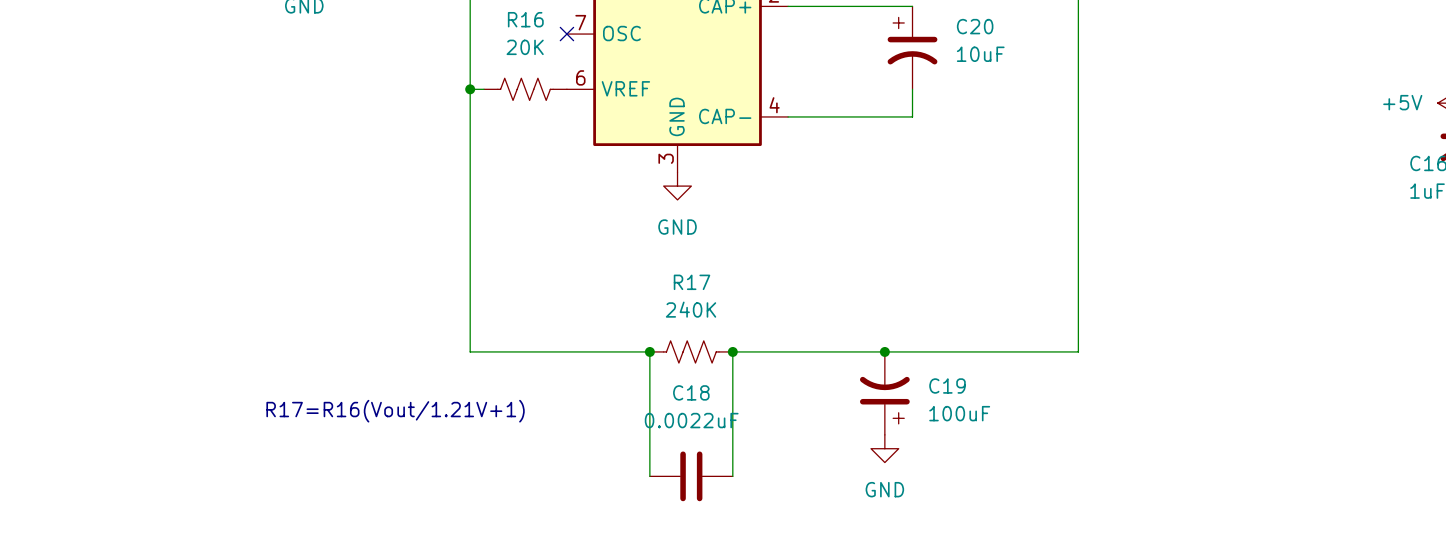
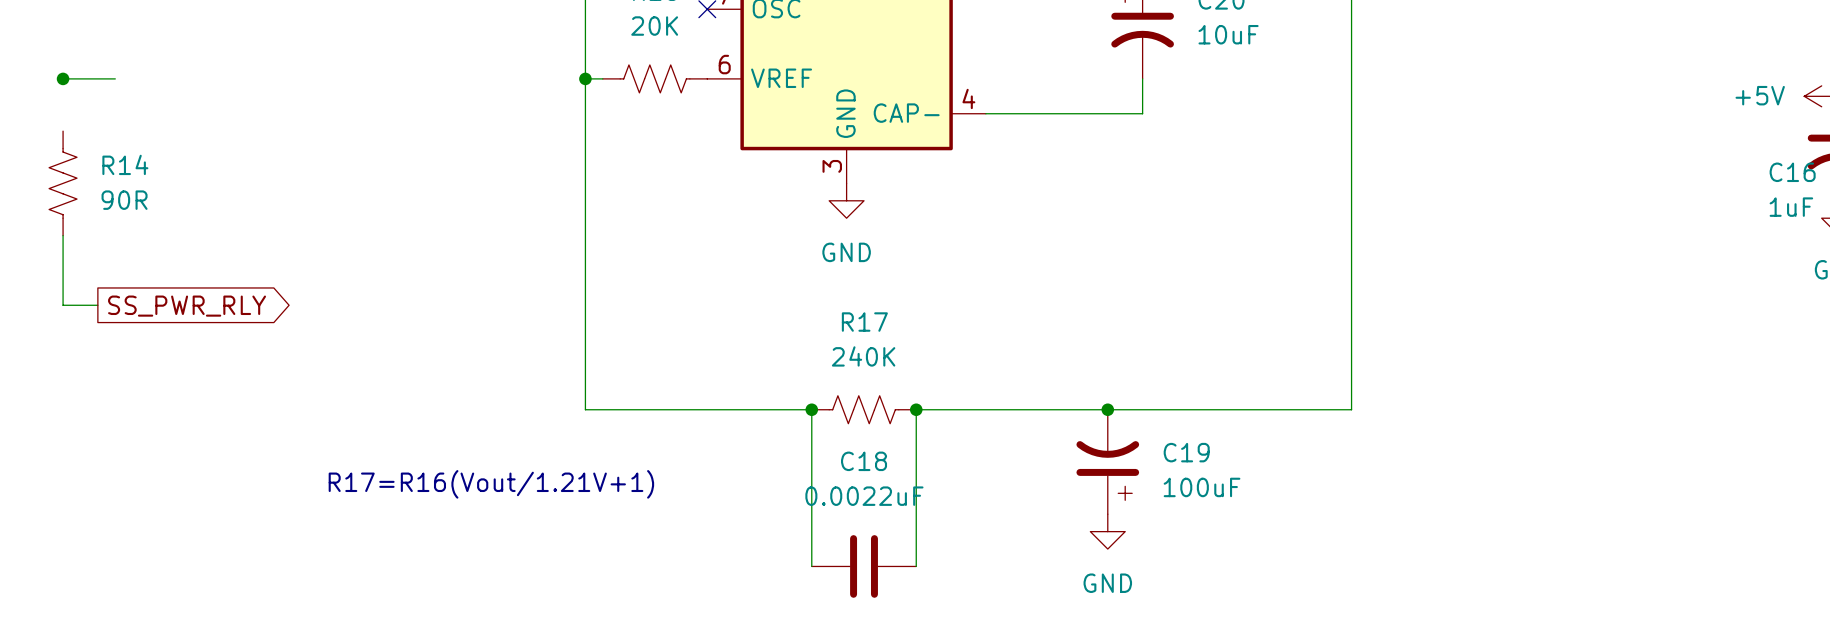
wire: none -> (63, 78) (115, 78)
junction: none -> (63, 78)
R14: none -> 90R (63, 183)
wire: none -> (63, 235) (63, 305) (97, 305)
global label: none -> SS_PWR_RLY (187, 306)

